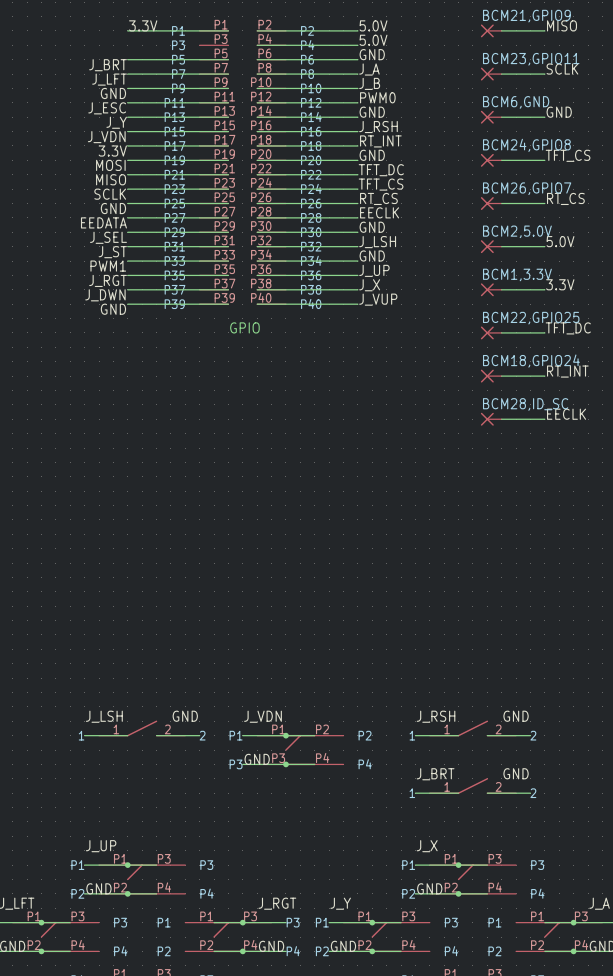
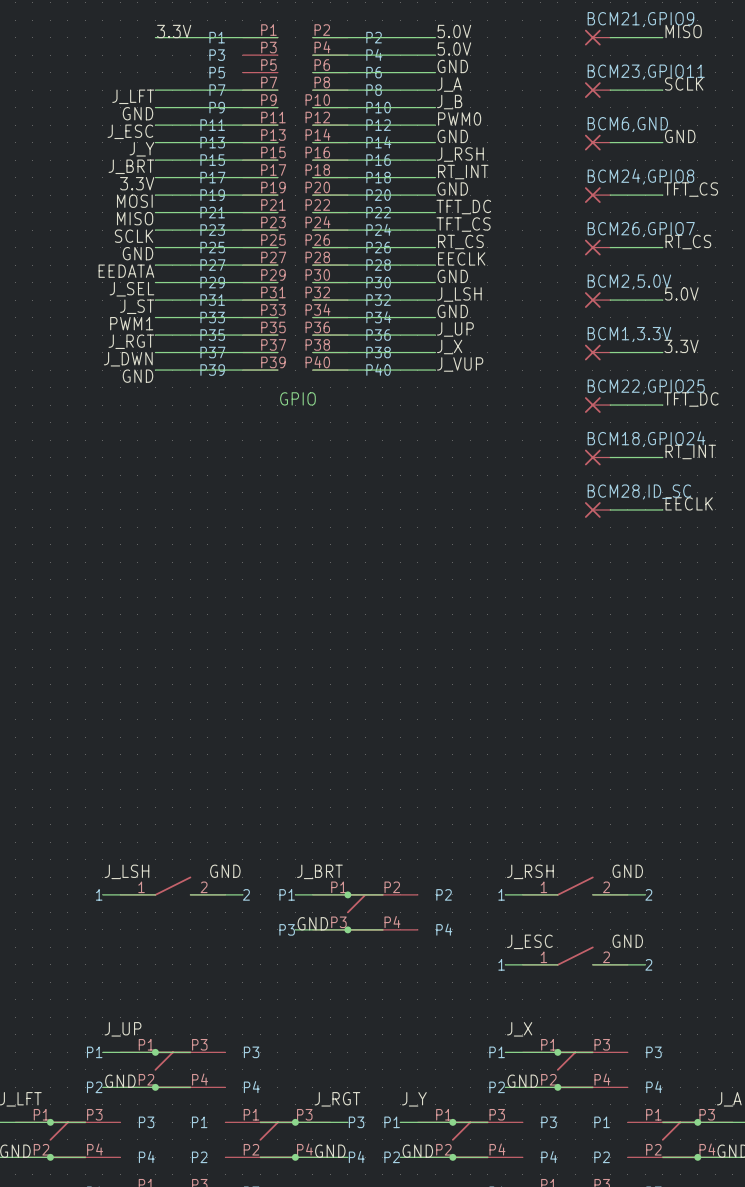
wire: (127, 59) (228, 59) -> none
label: J_BRT (108, 65) -> none
label: J_VDN (106, 137) -> J_BRT (131, 166)
label: J_VDN (262, 716) -> J_BRT (319, 871)
label: J_BRT (435, 774) -> J_ESC (529, 941)

